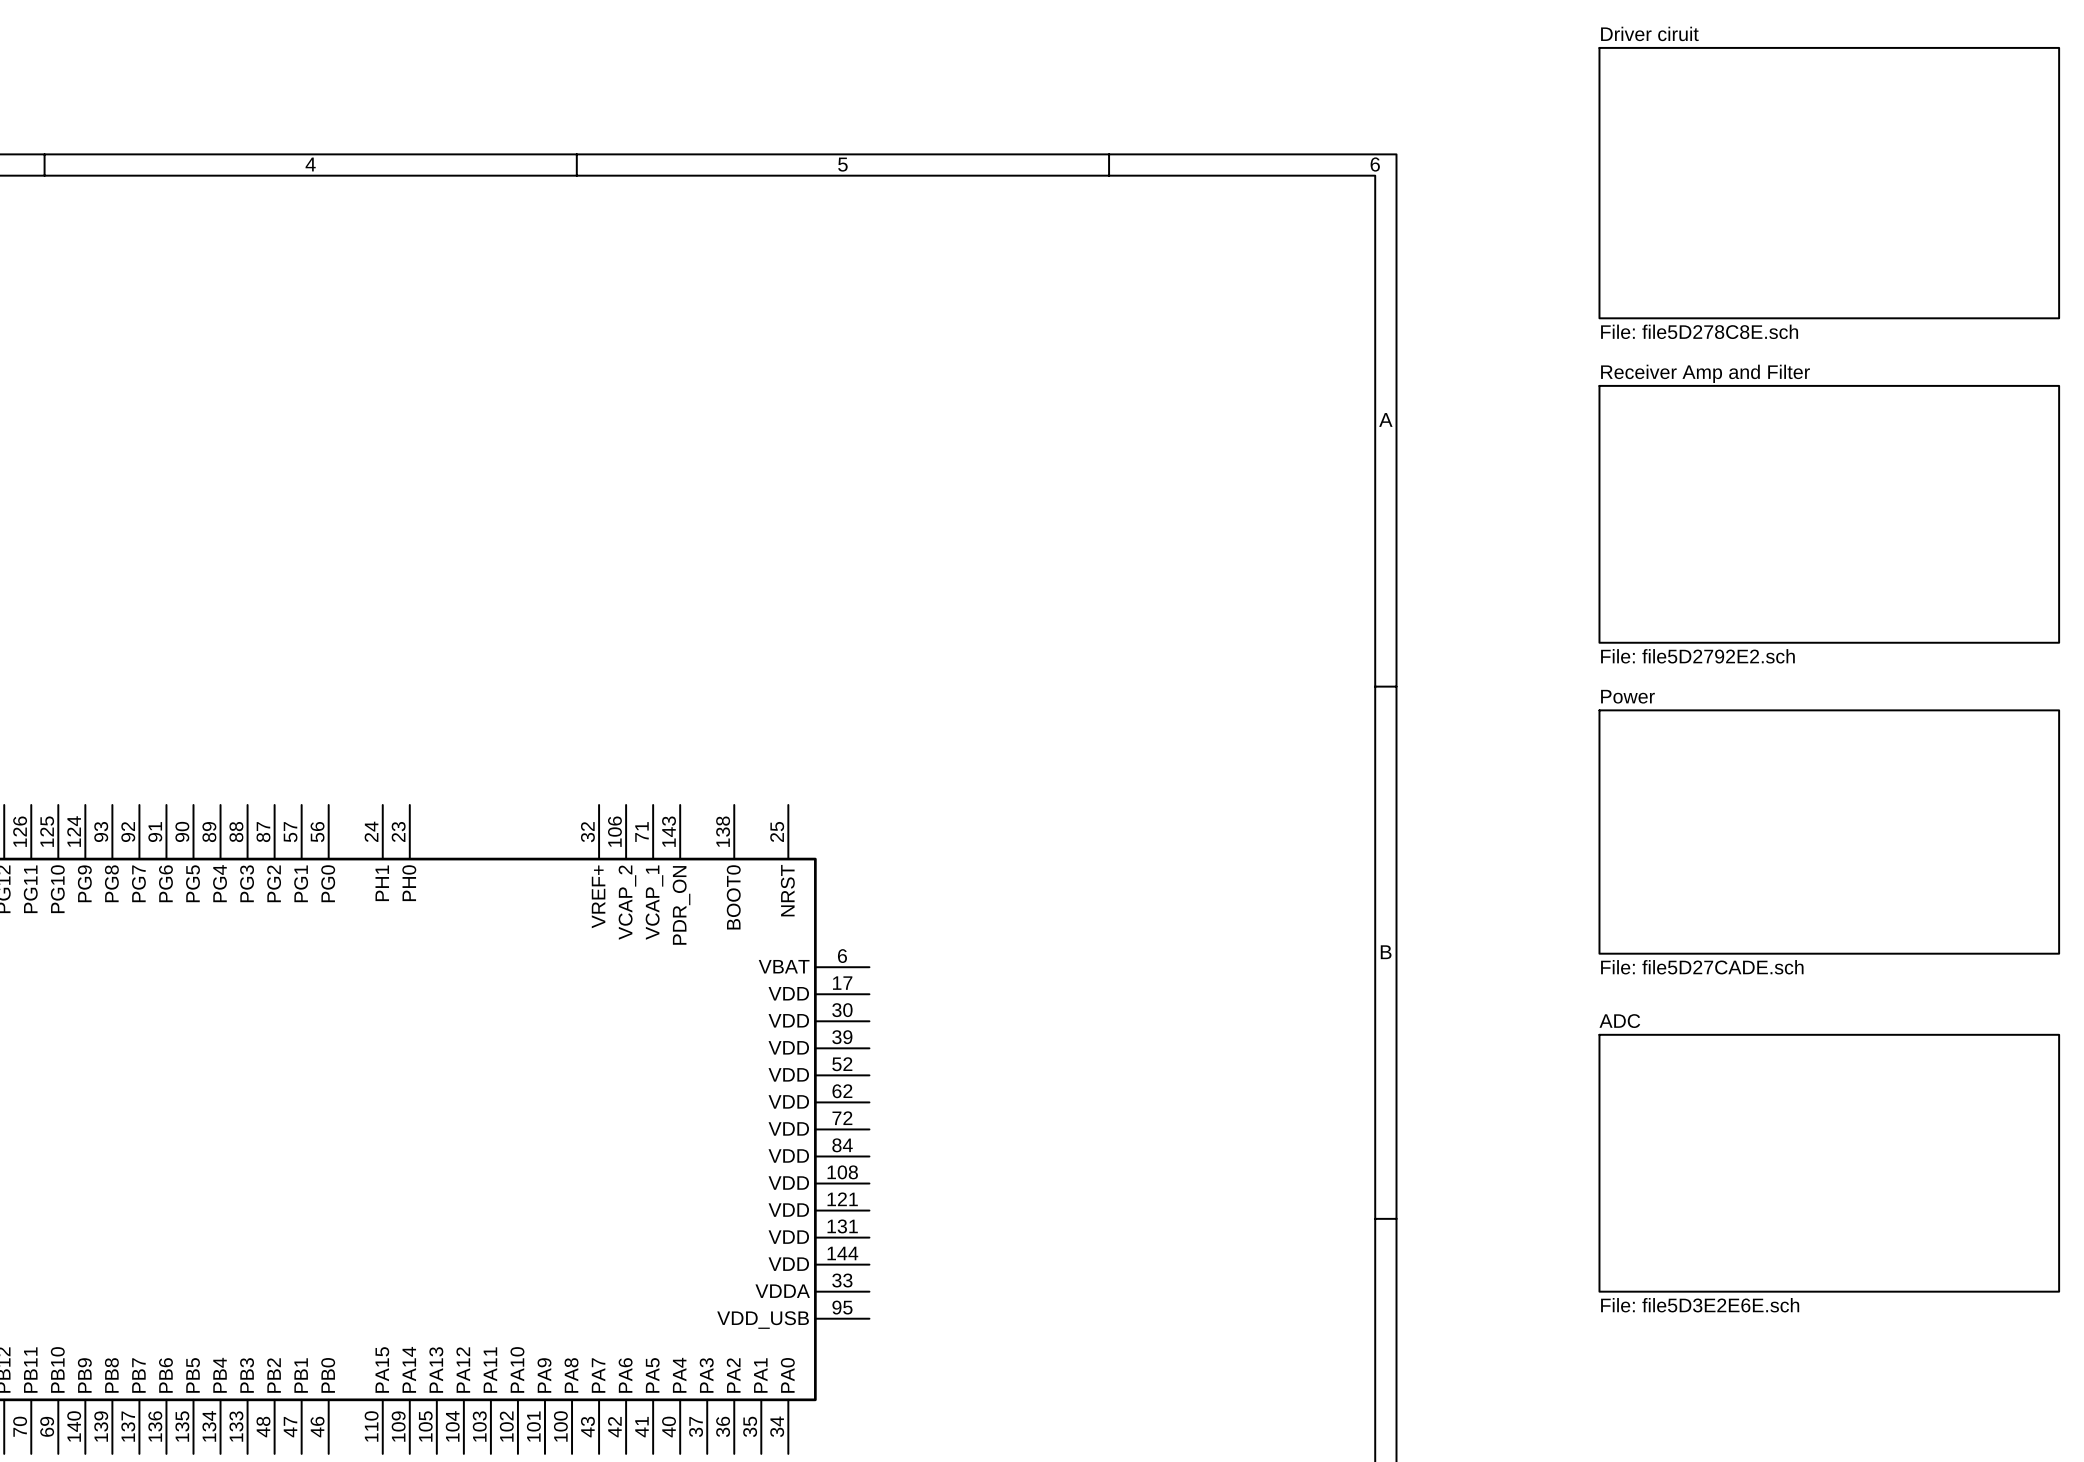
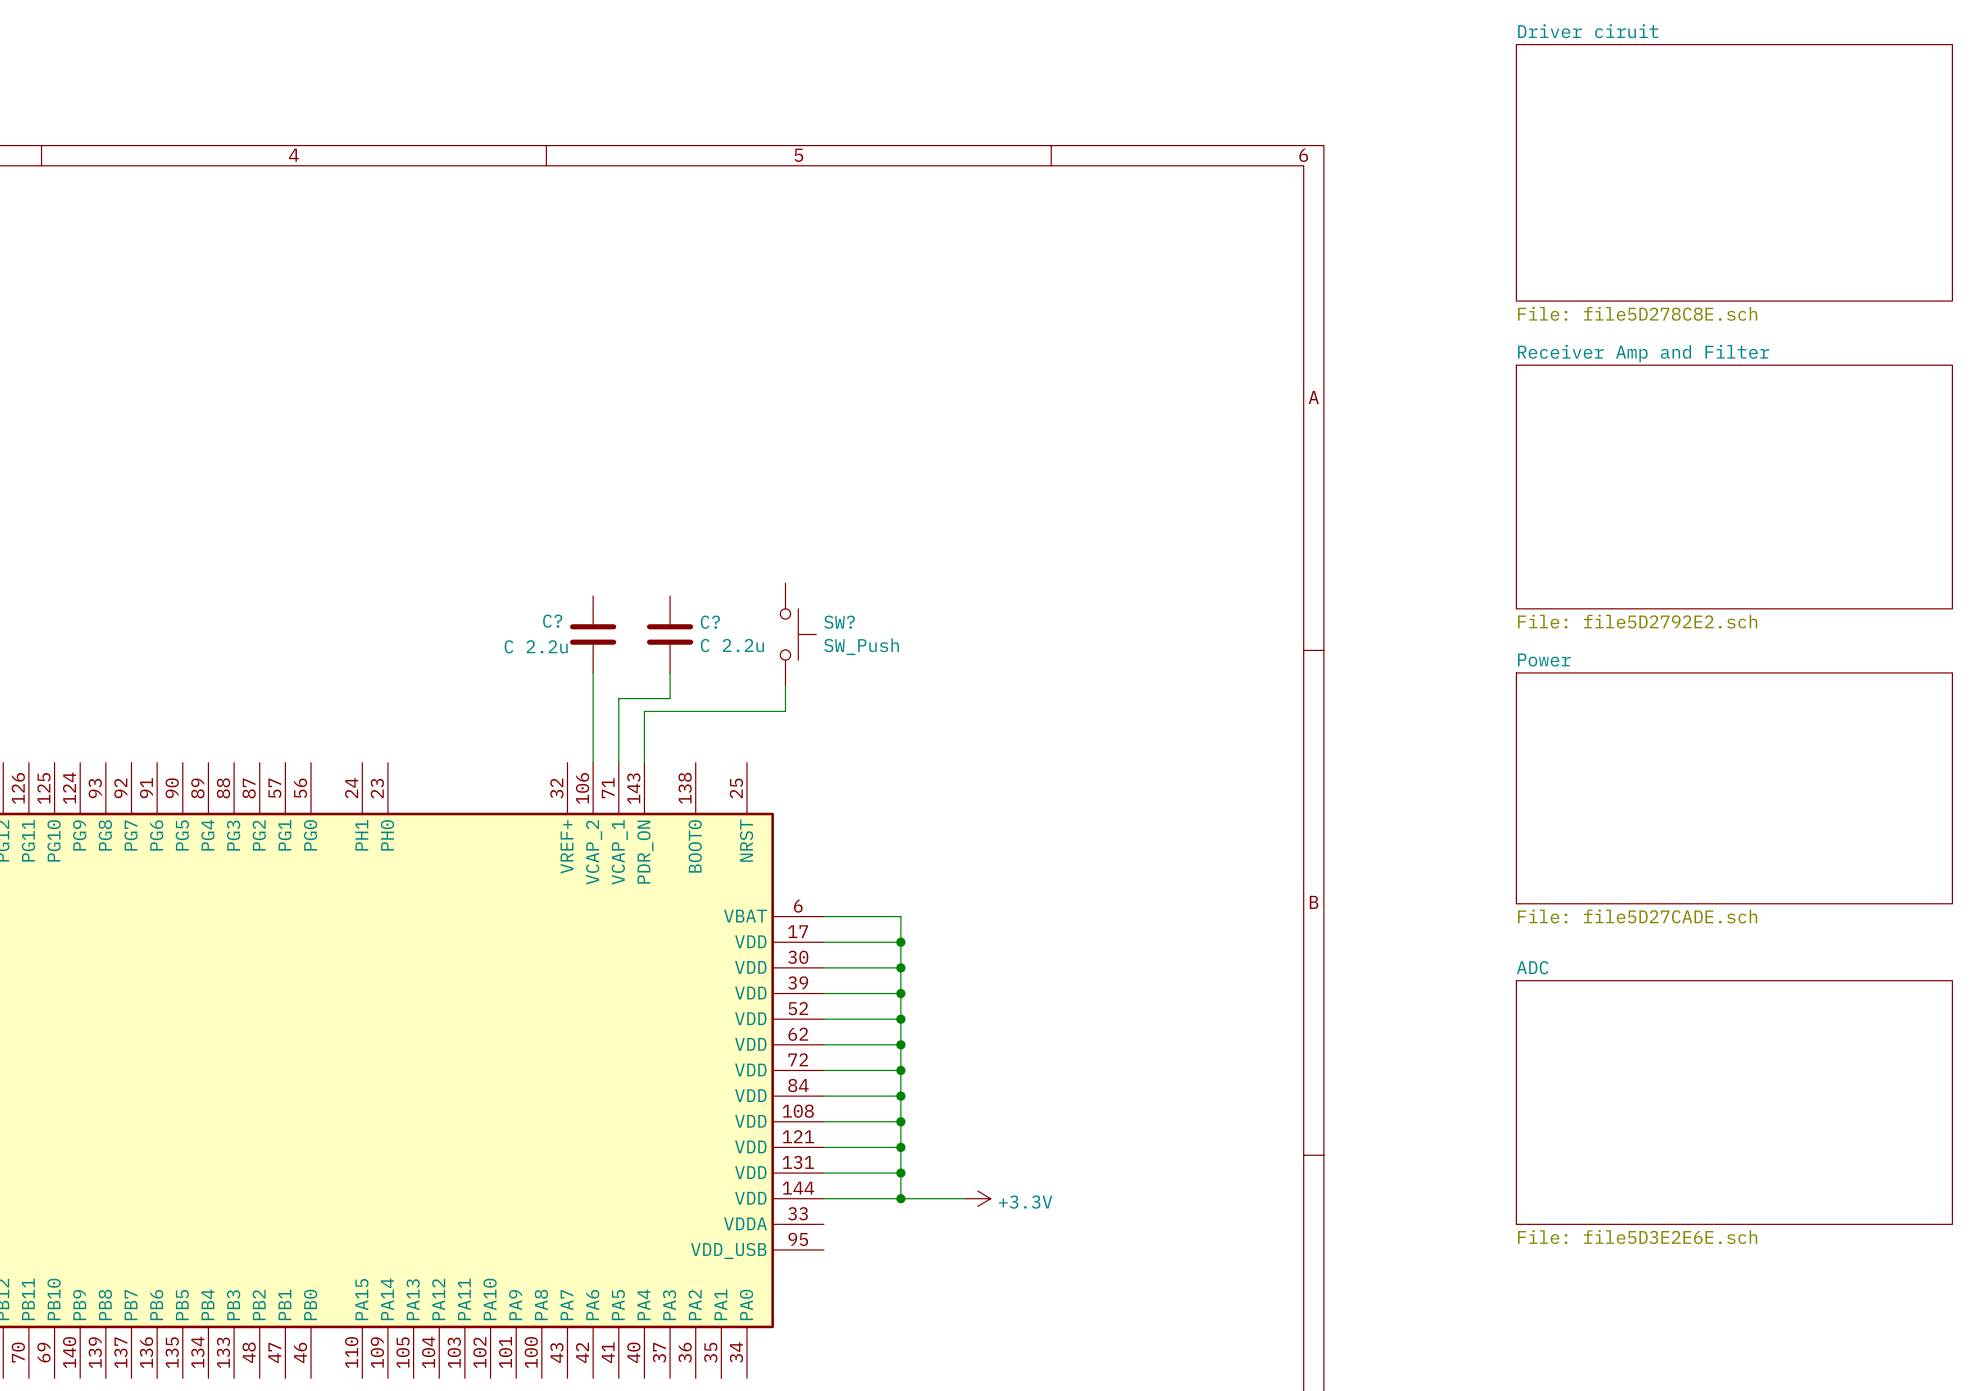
C?: none -> C 2.2u (593, 634)
C?: none -> C 2.2u (670, 634)
SW?: none -> SW_Push (798, 634)
wire: none -> (593, 672) (593, 762)
wire: none -> (670, 672) (670, 698) (618, 698) (618, 762)
wire: none -> (785, 685) (785, 711) (644, 711) (644, 762)
wire: none -> (823, 916) (900, 916) (900, 1198)
wire: none -> (823, 942) (900, 942)
junction: none -> (900, 942)
wire: none -> (823, 967) (900, 967)
junction: none -> (900, 967)
wire: none -> (823, 993) (900, 993)
junction: none -> (900, 993)
wire: none -> (823, 1019) (900, 1019)
junction: none -> (900, 1019)
wire: none -> (823, 1044) (900, 1044)
junction: none -> (900, 1044)
wire: none -> (823, 1070) (900, 1070)
junction: none -> (900, 1070)
wire: none -> (823, 1096) (900, 1096)
junction: none -> (900, 1096)
wire: none -> (823, 1121) (900, 1121)
junction: none -> (900, 1121)
wire: none -> (823, 1147) (900, 1147)
junction: none -> (900, 1147)
wire: none -> (823, 1173) (900, 1173)
junction: none -> (900, 1173)
wire: none -> (823, 1198) (965, 1198)
junction: none -> (900, 1198)
power symbol: none -> +3.3V (977, 1198)

